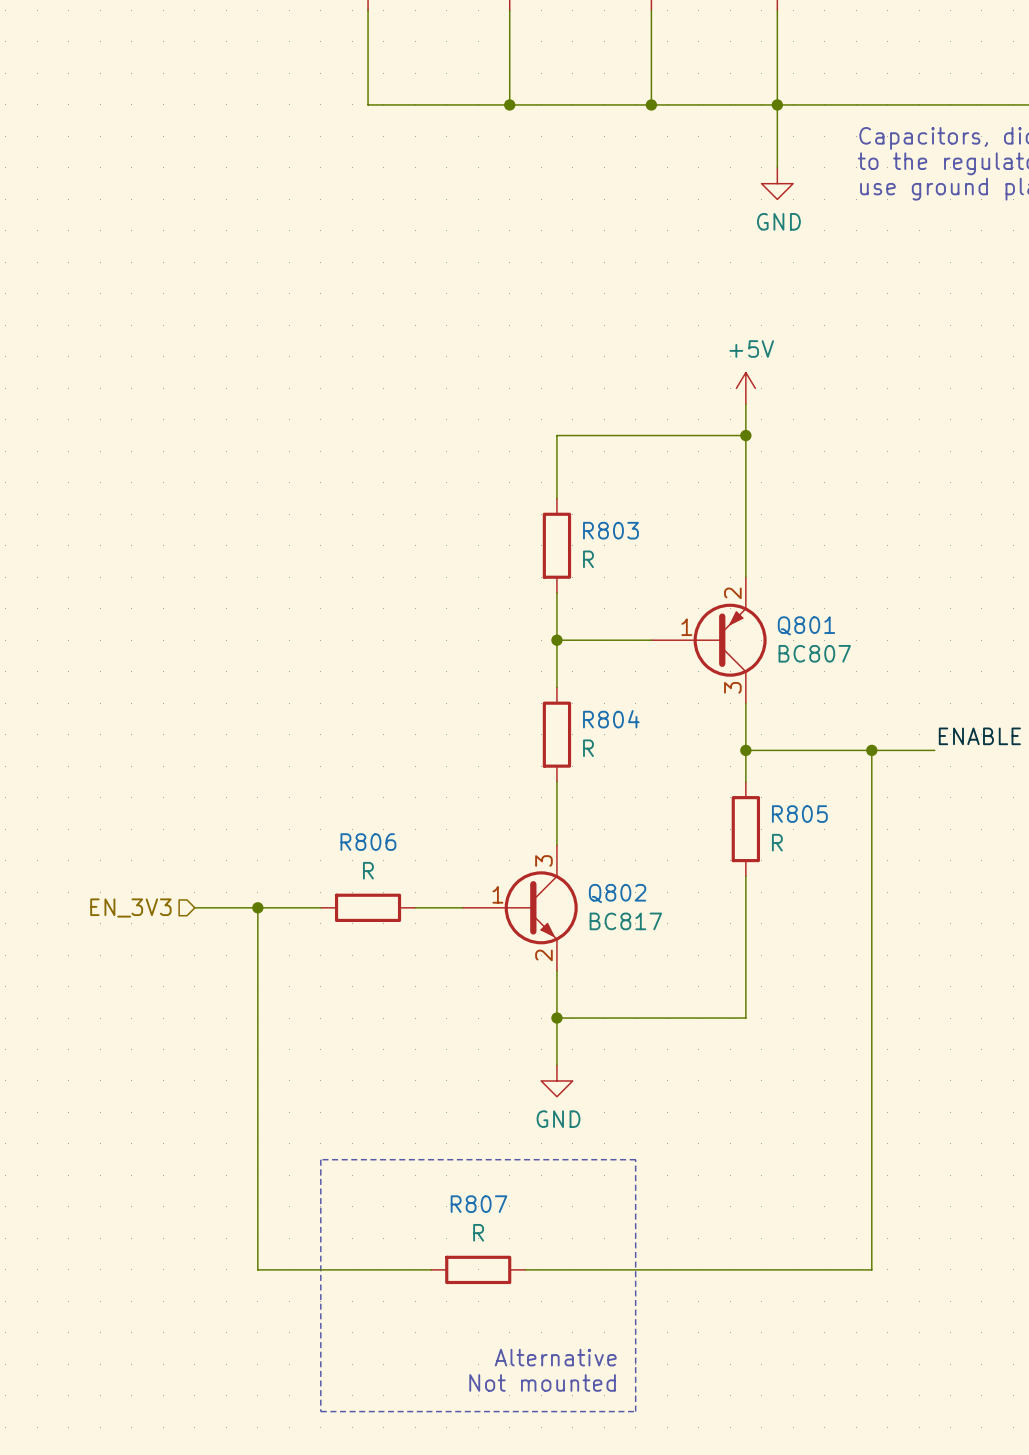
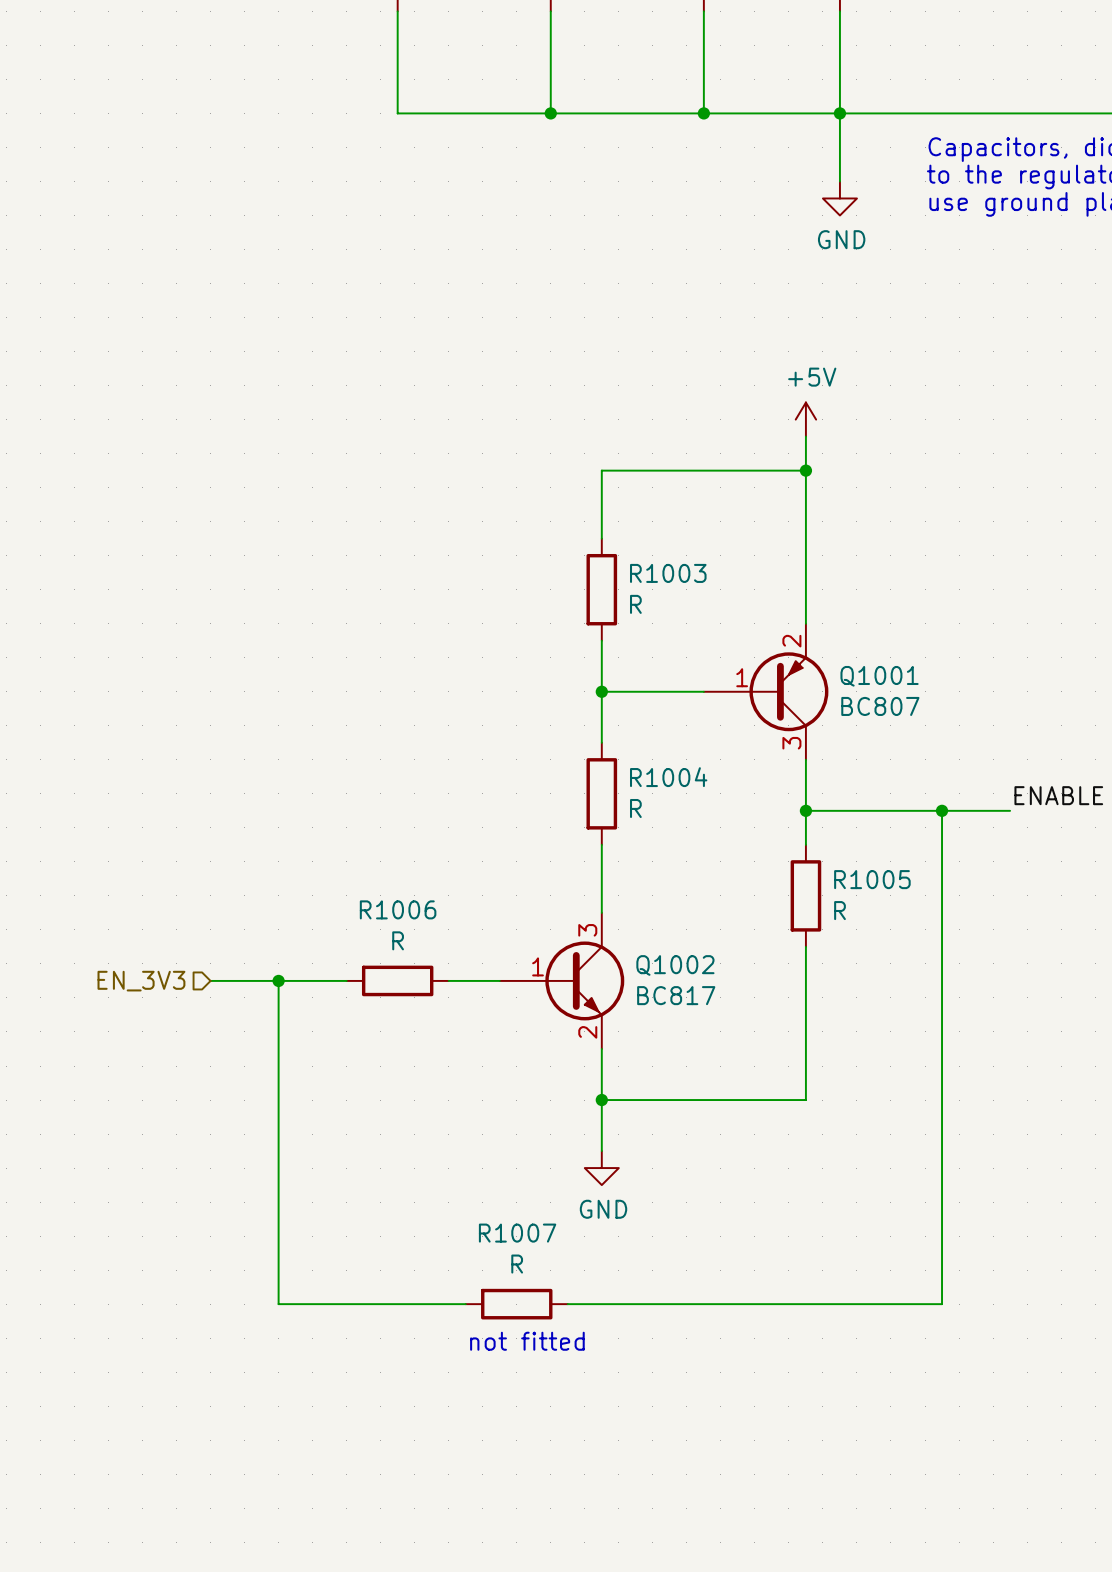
R803 name: R803 (610, 530) -> R1003 (668, 573)
Q801 name: Q801 (806, 625) -> Q1001 (879, 676)
R804 name: R804 (611, 719) -> R1004 (668, 777)
R805 name: R805 (799, 814) -> R1005 (872, 879)
R806 name: R806 (368, 842) -> R1006 (398, 909)
Q802 name: Q802 (617, 893) -> Q1002 (675, 965)
line: (320, 1159) (320, 1411) (635, 1411) (635, 1159) (320, 1159) -> none
wire: (257, 1206) (257, 1269) (431, 1269) -> (278, 1304) (465, 1304)
R1007: none -> R (516, 1304)
wire: (871, 1206) (871, 1269) (525, 1269) -> (942, 1304) (567, 1304)
text: none -> not fitted (527, 1341)
R807: R (478, 1269) -> none
text: Alternative (555, 1357) -> none
text: Not mounted (542, 1382) -> none

